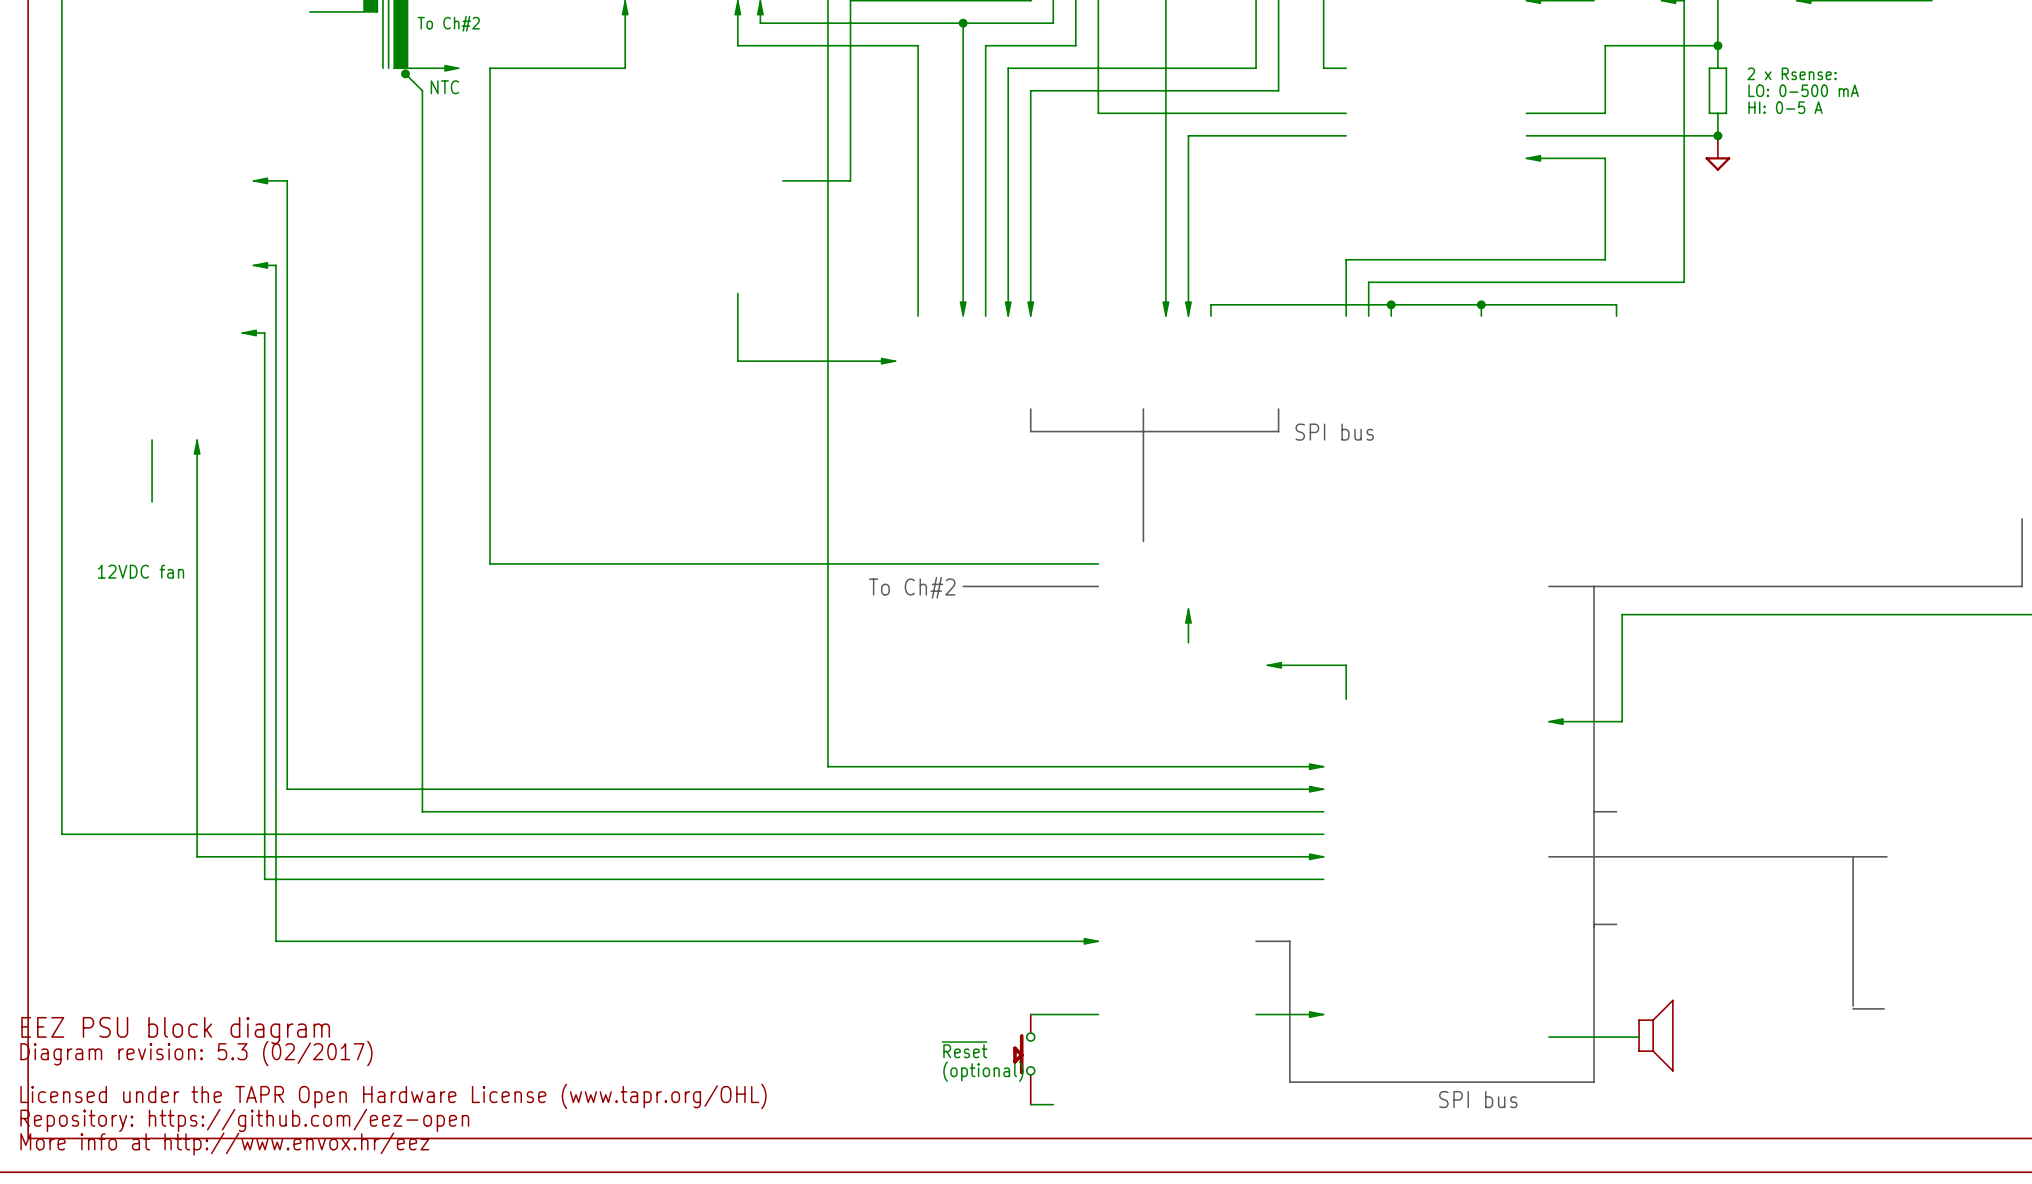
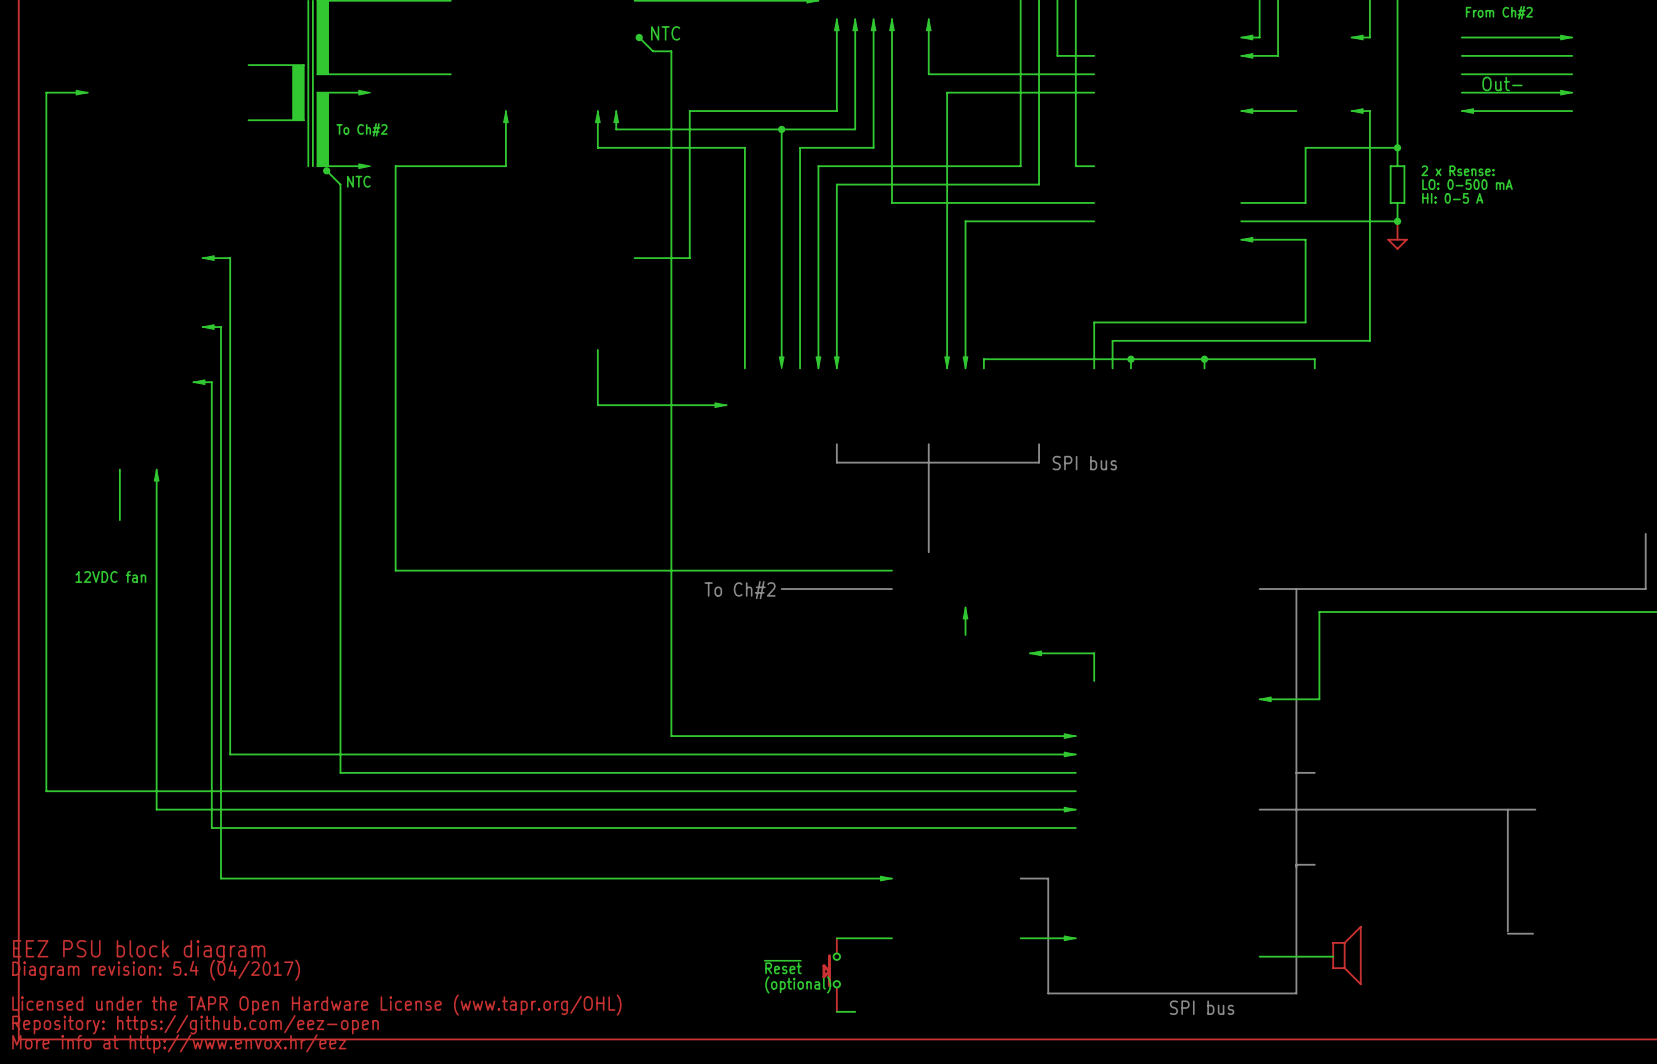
text: Diagram revision: 5.3 (02/2017) (196, 1053) -> Diagram revision: 5.4 (04/2017) (156, 970)

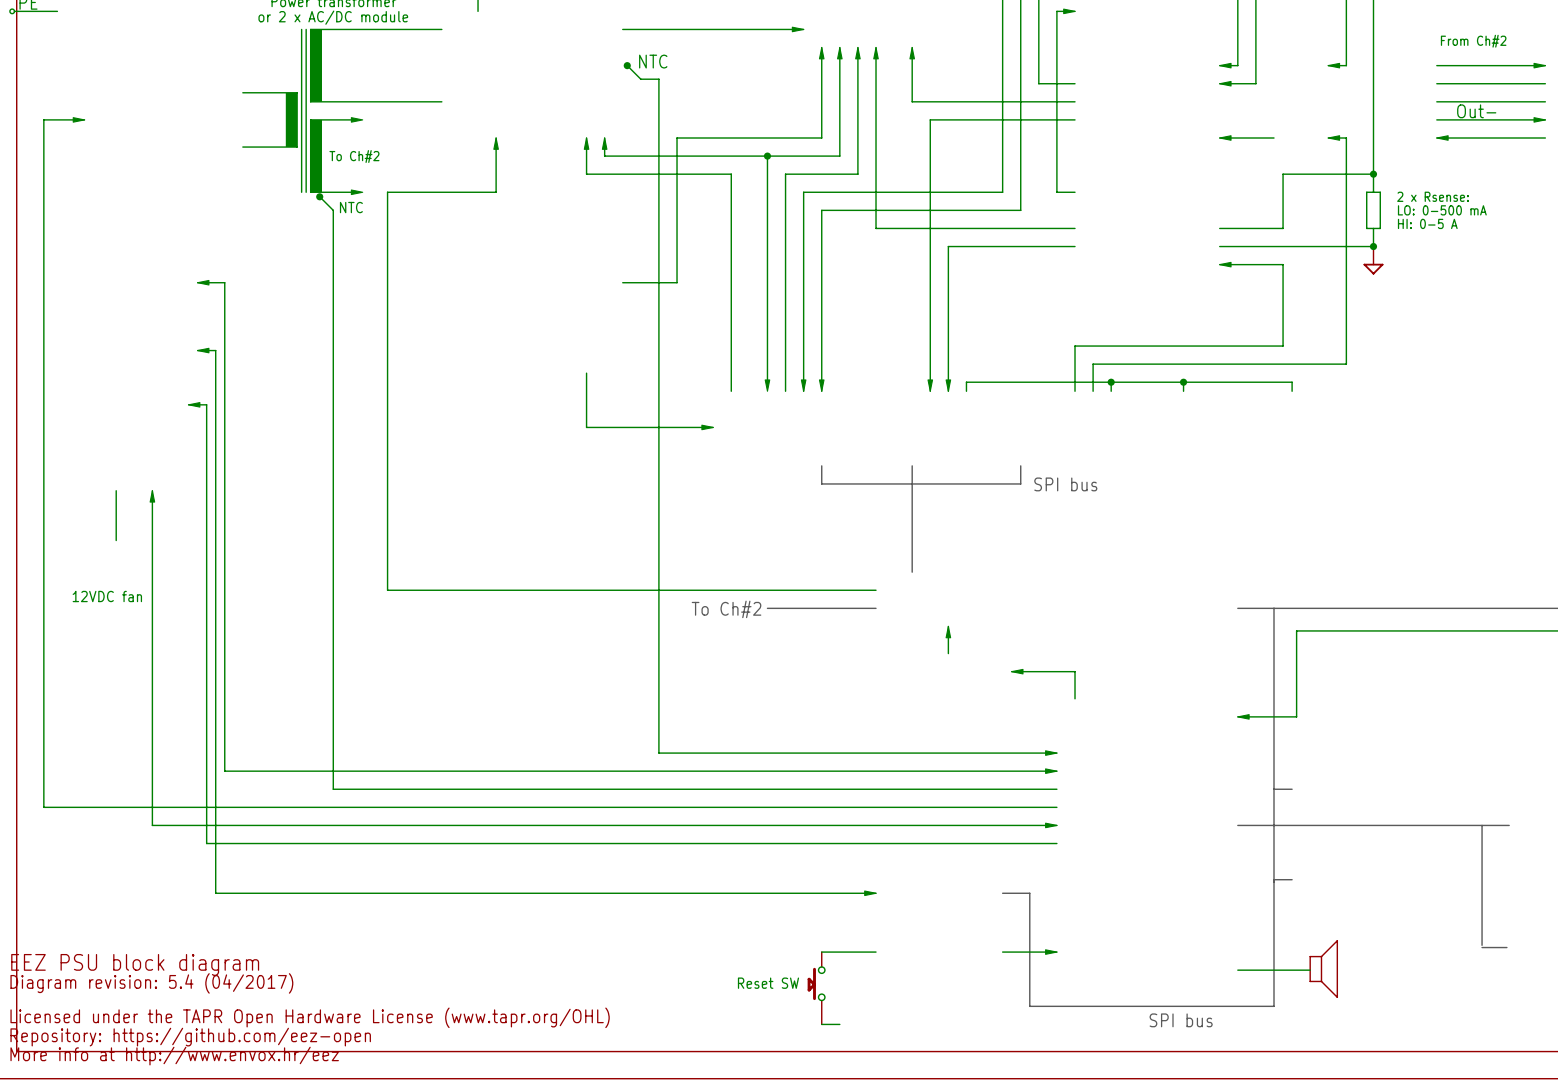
text: ~{Reset} (782, 967) -> Reset SW (768, 983)
text: (optional) (798, 984) -> none

